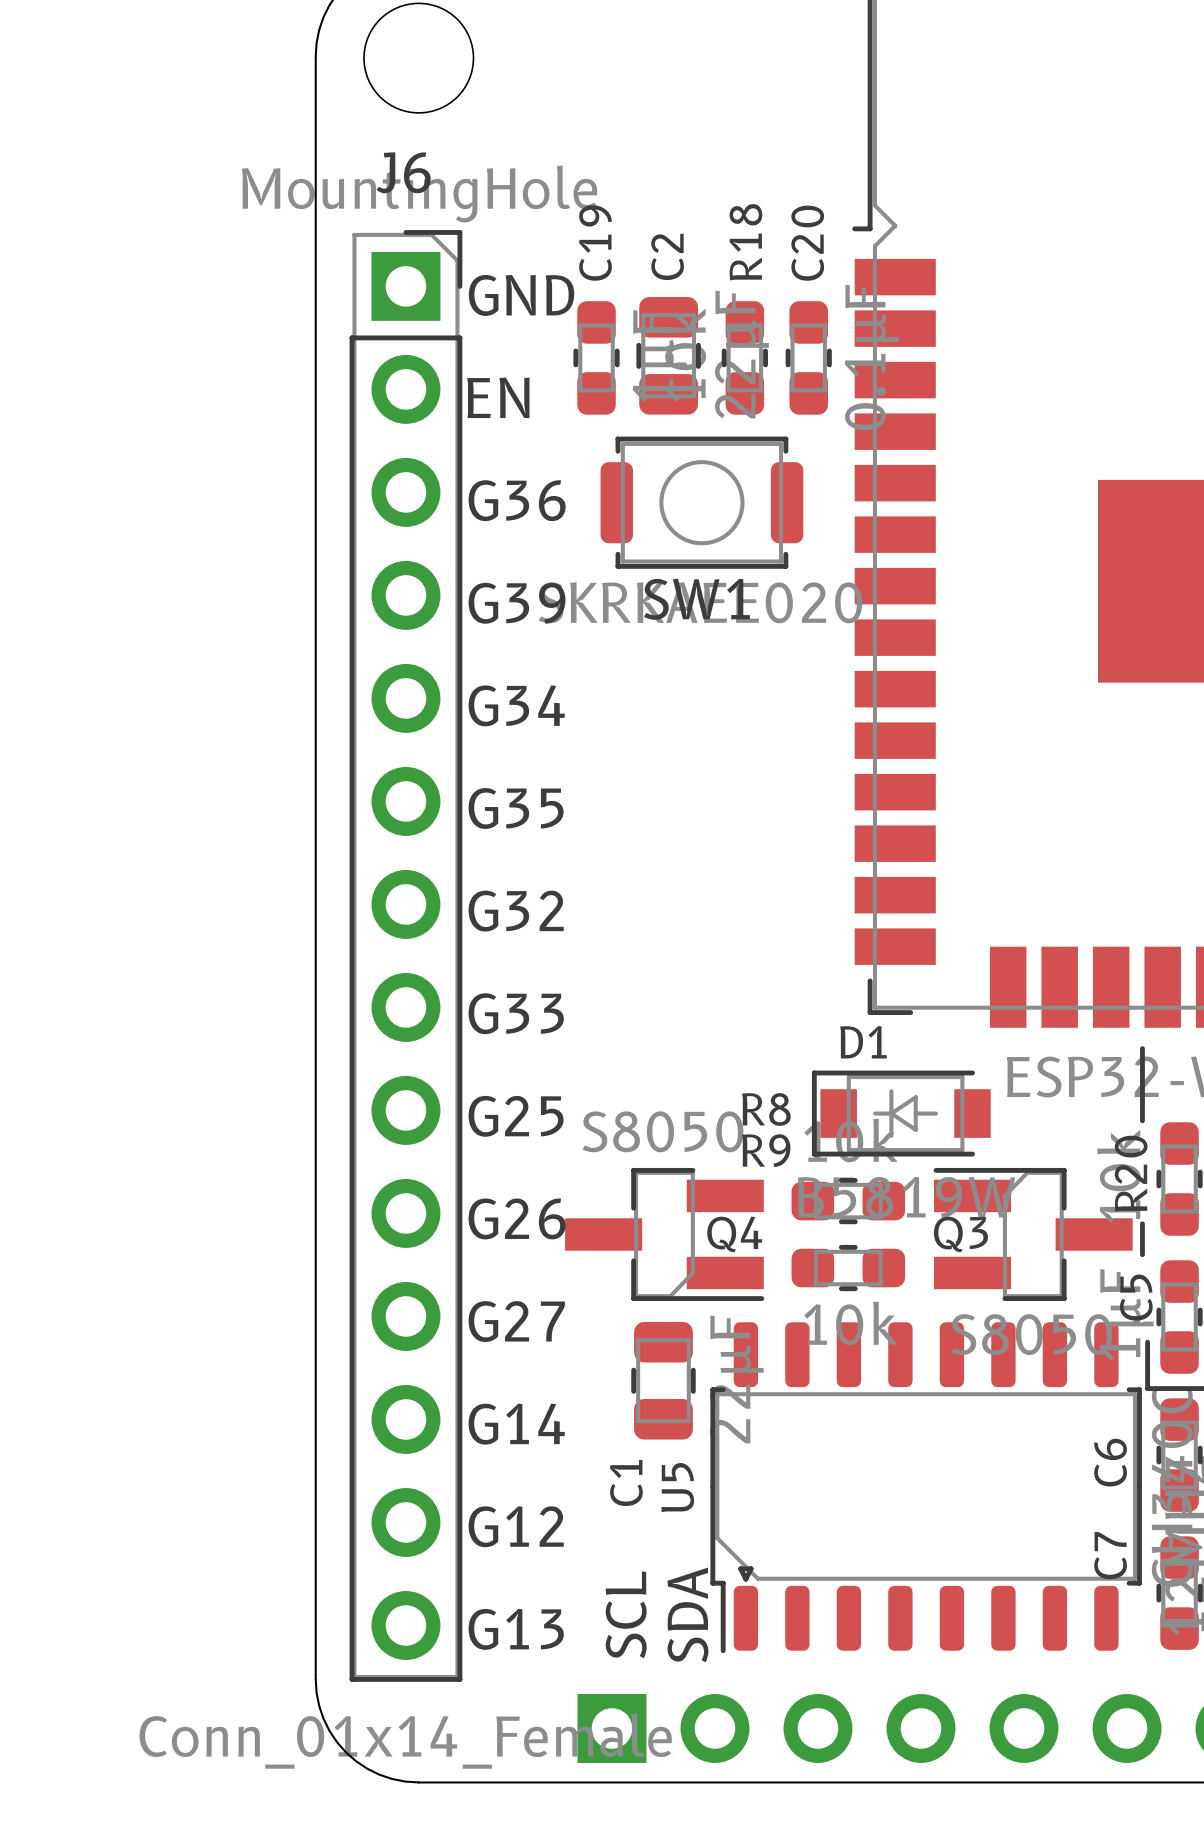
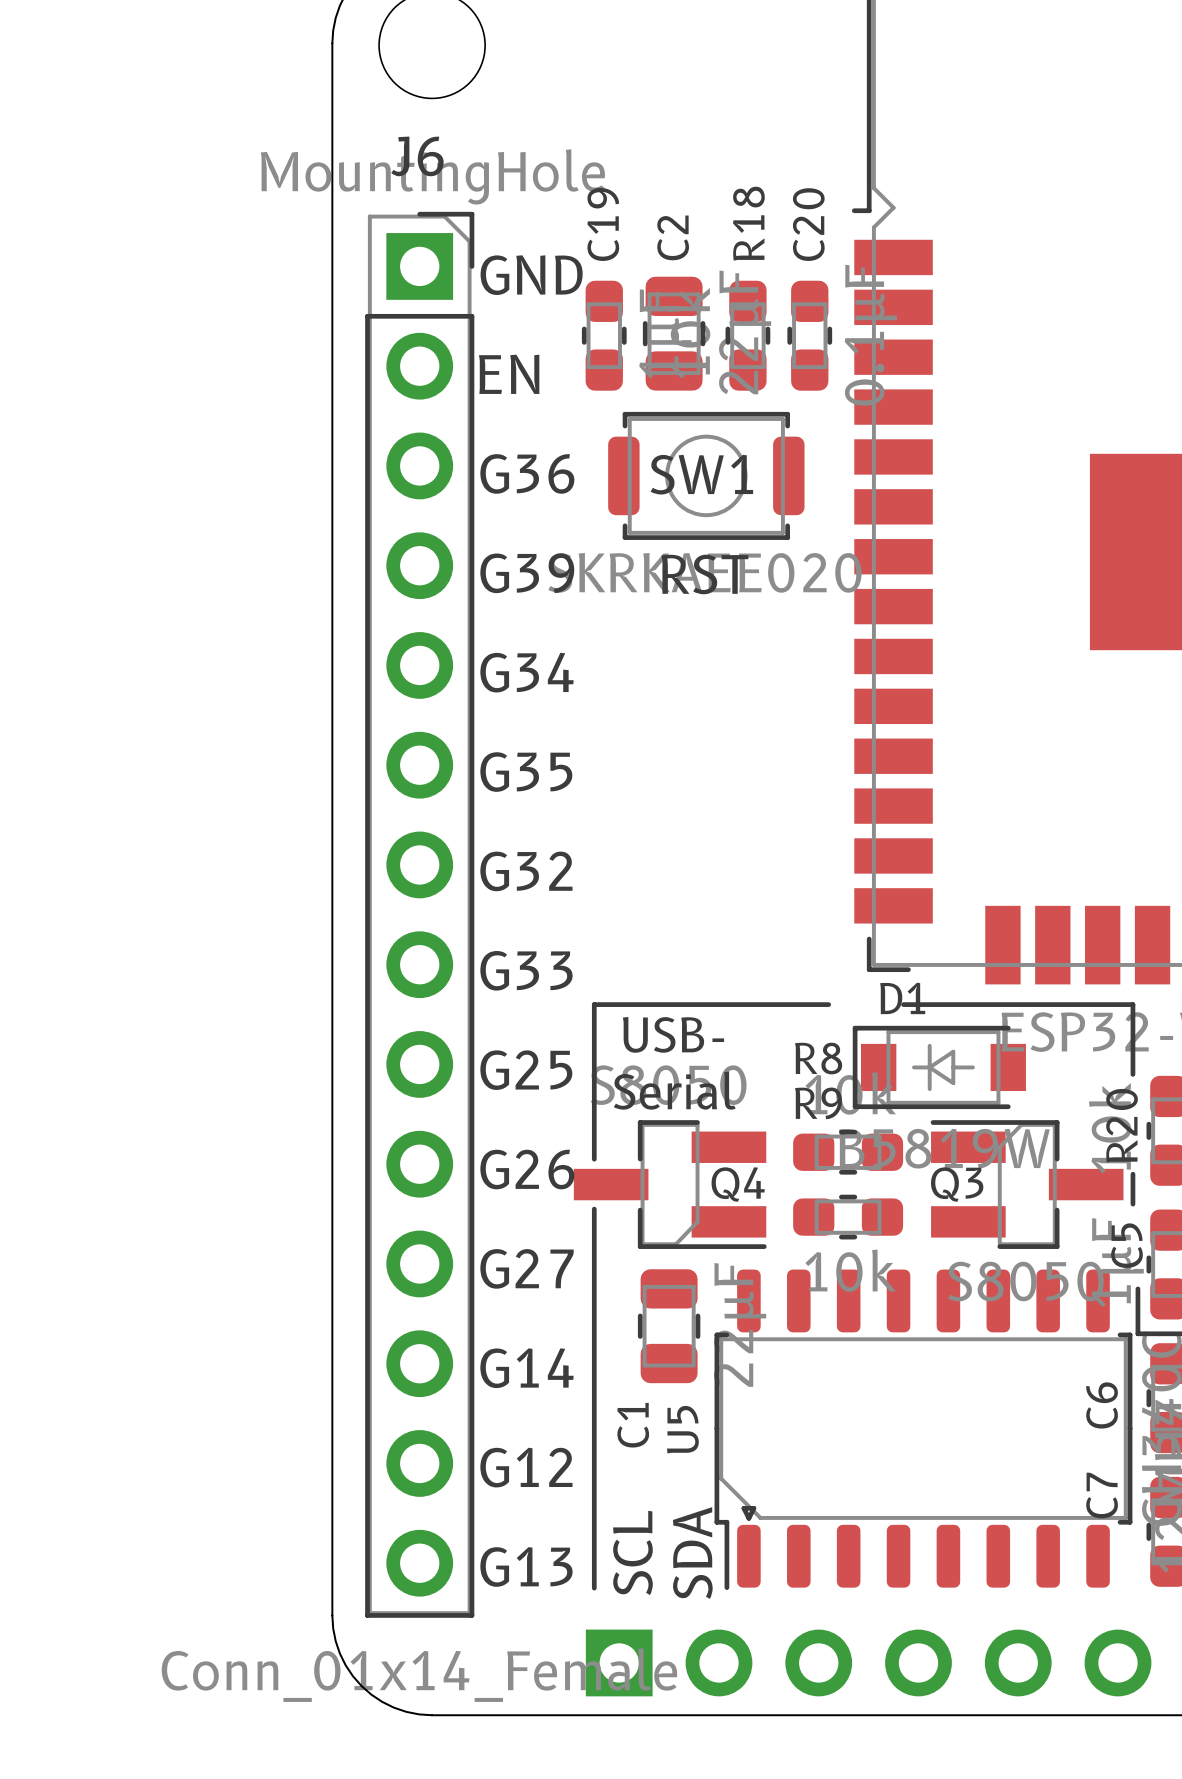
SW1 name position: SW1 (696, 599) -> SW1 (701, 474)
text: none -> RST (704, 574)
line: none -> (828, 1004) (594, 1004) (594, 1159)
line: none -> (903, 1004) (1132, 1004)
text: none -> USB- (673, 1034)
R8 name position: R8 (766, 1109) -> R8 (818, 1058)
D1 position: (901, 1113) -> (939, 1067)
text: none -> Serial (674, 1090)
R9 name position: R9 (766, 1150) -> R9 (818, 1103)
line: none -> (594, 1209) (594, 1588)

